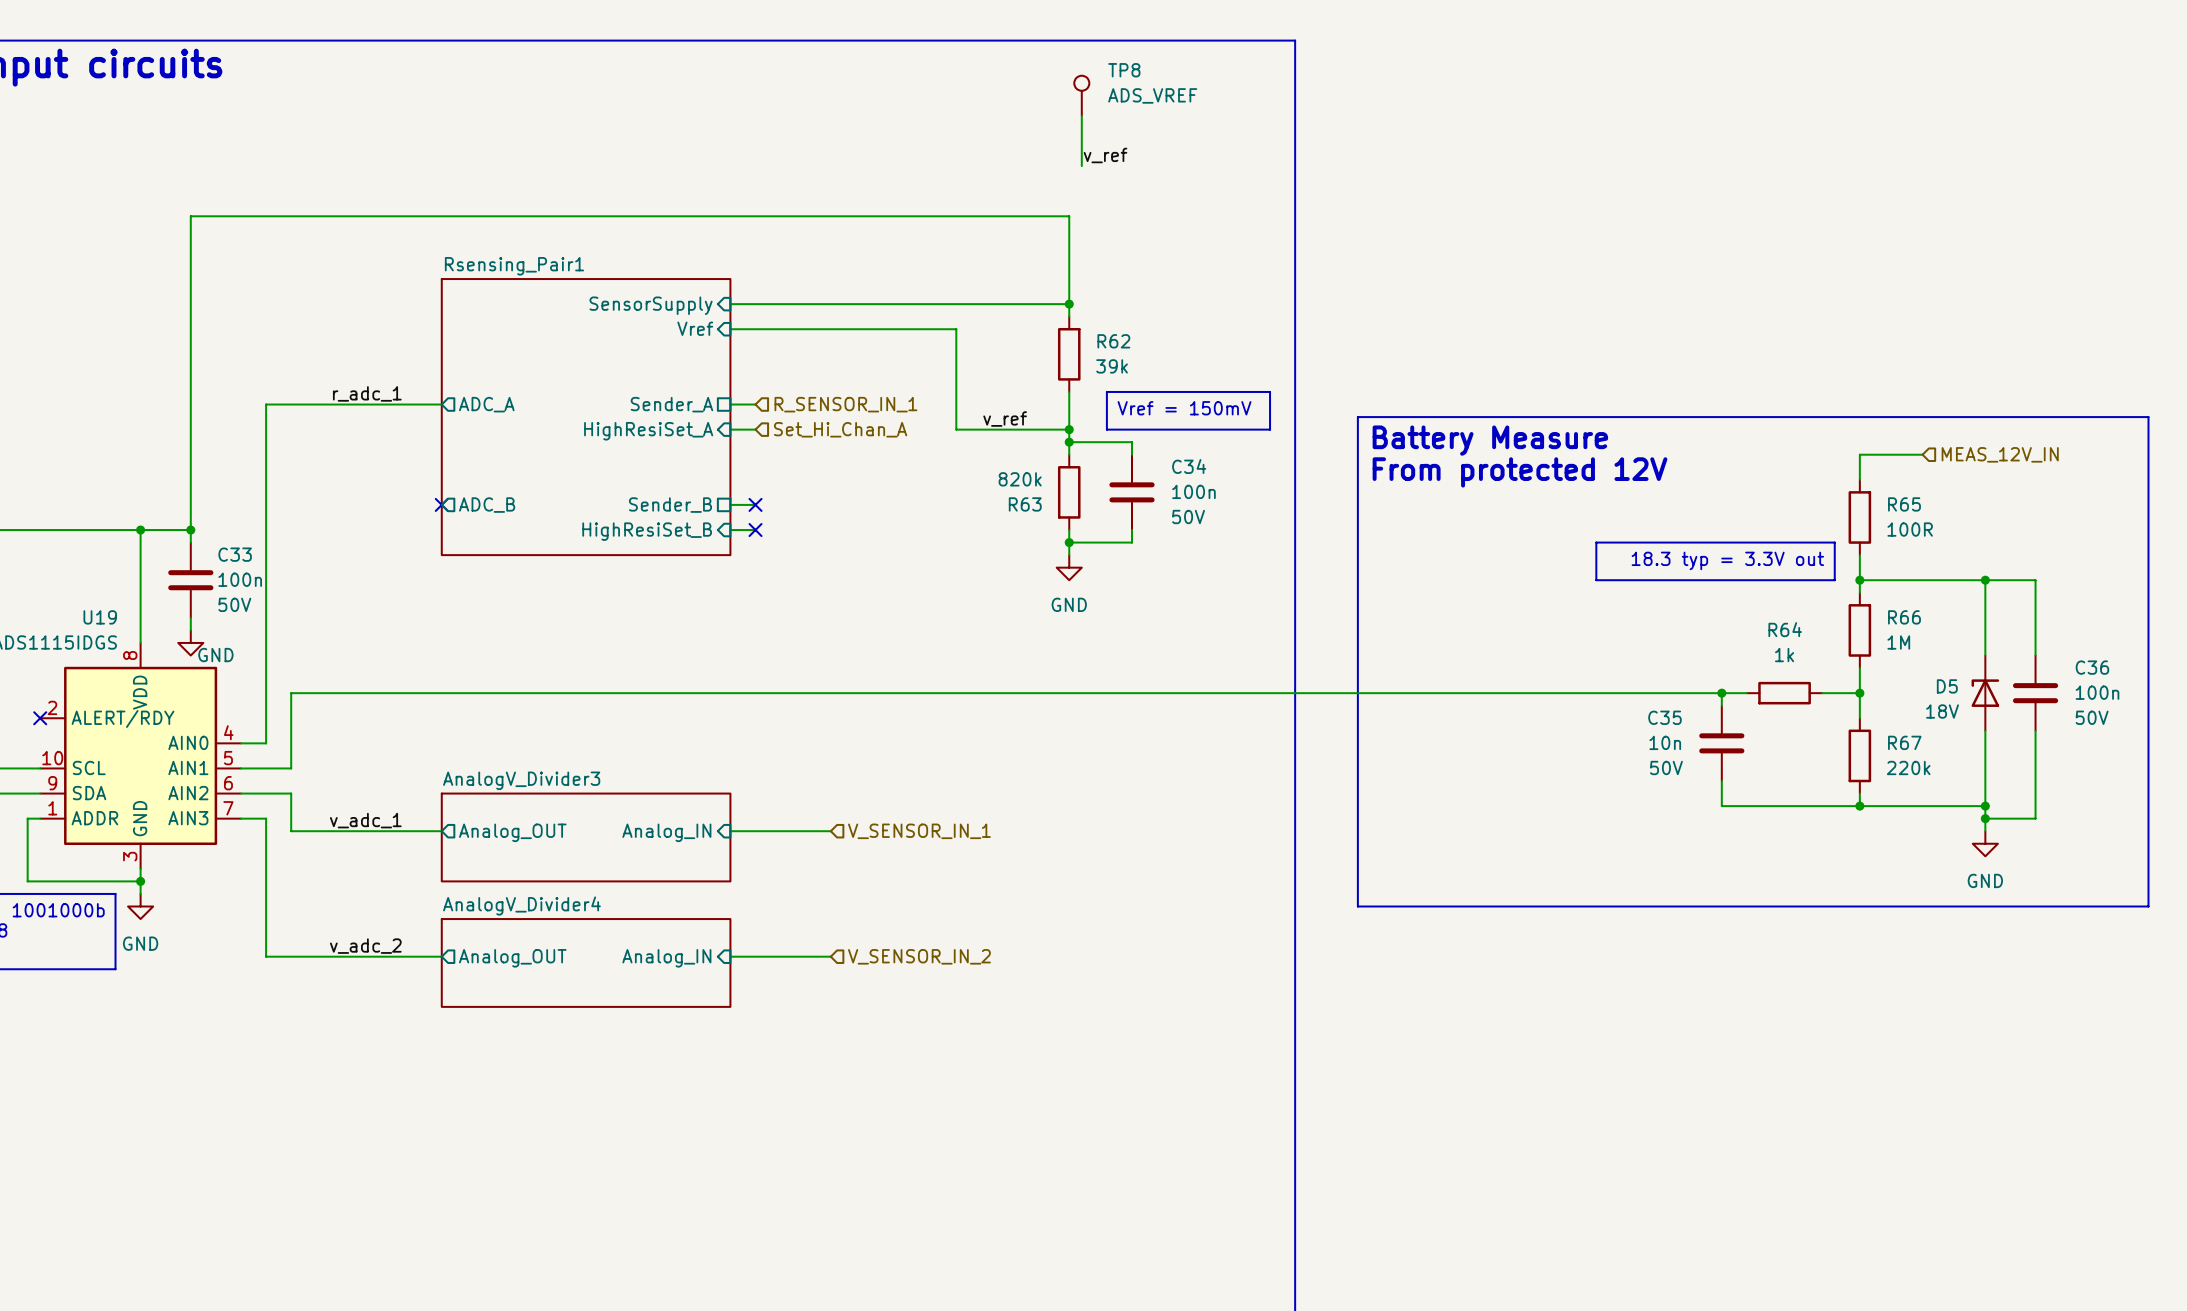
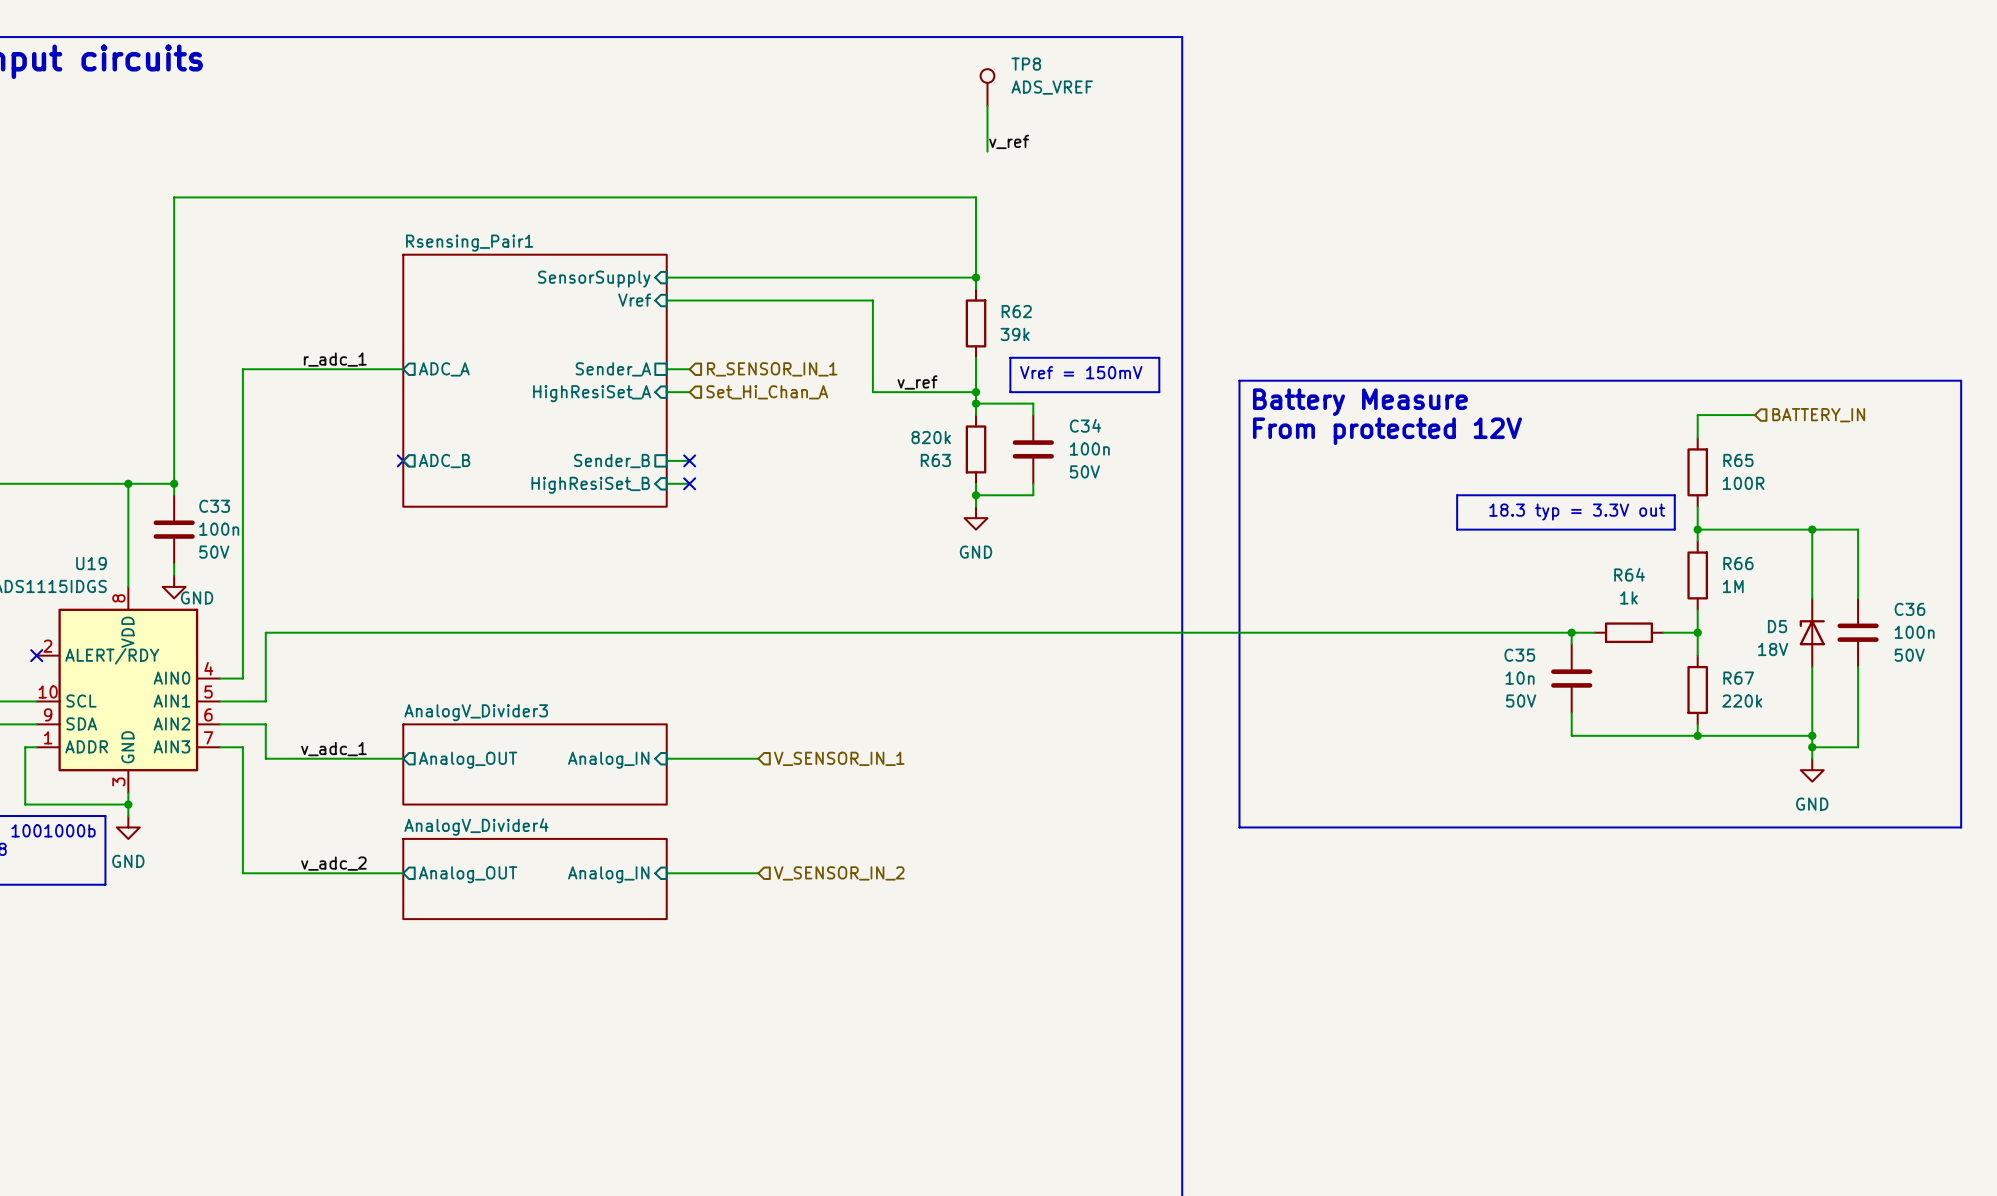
hierarchical label: MEAS_12V_IN (2000, 454) -> BATTERY_IN (1818, 415)

